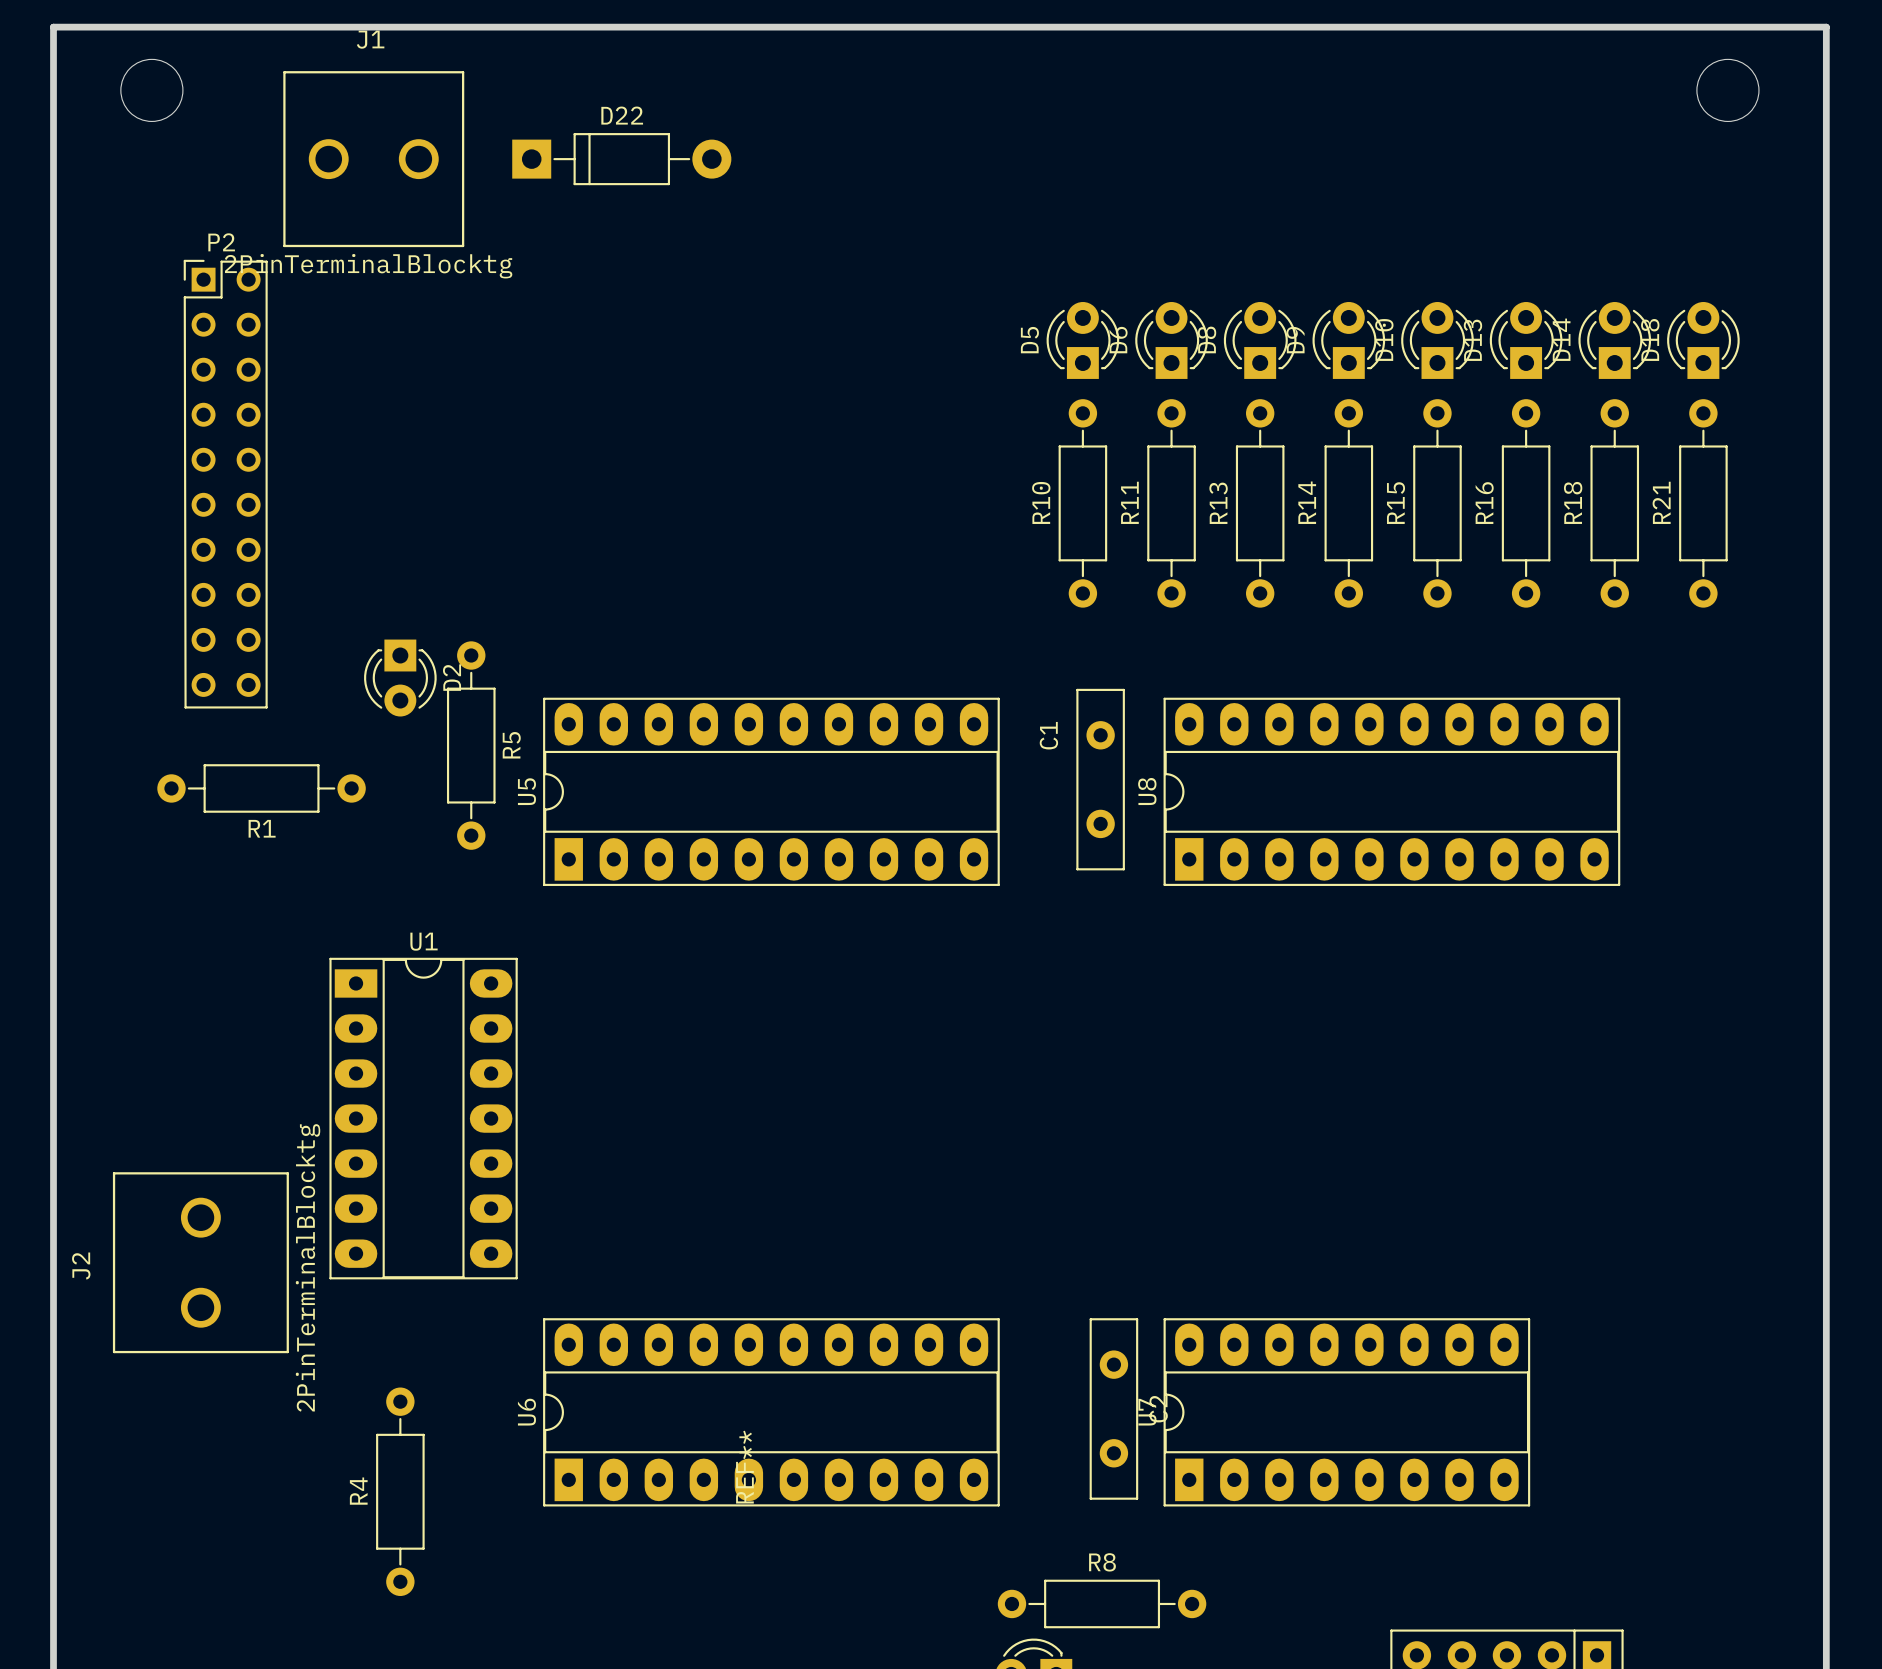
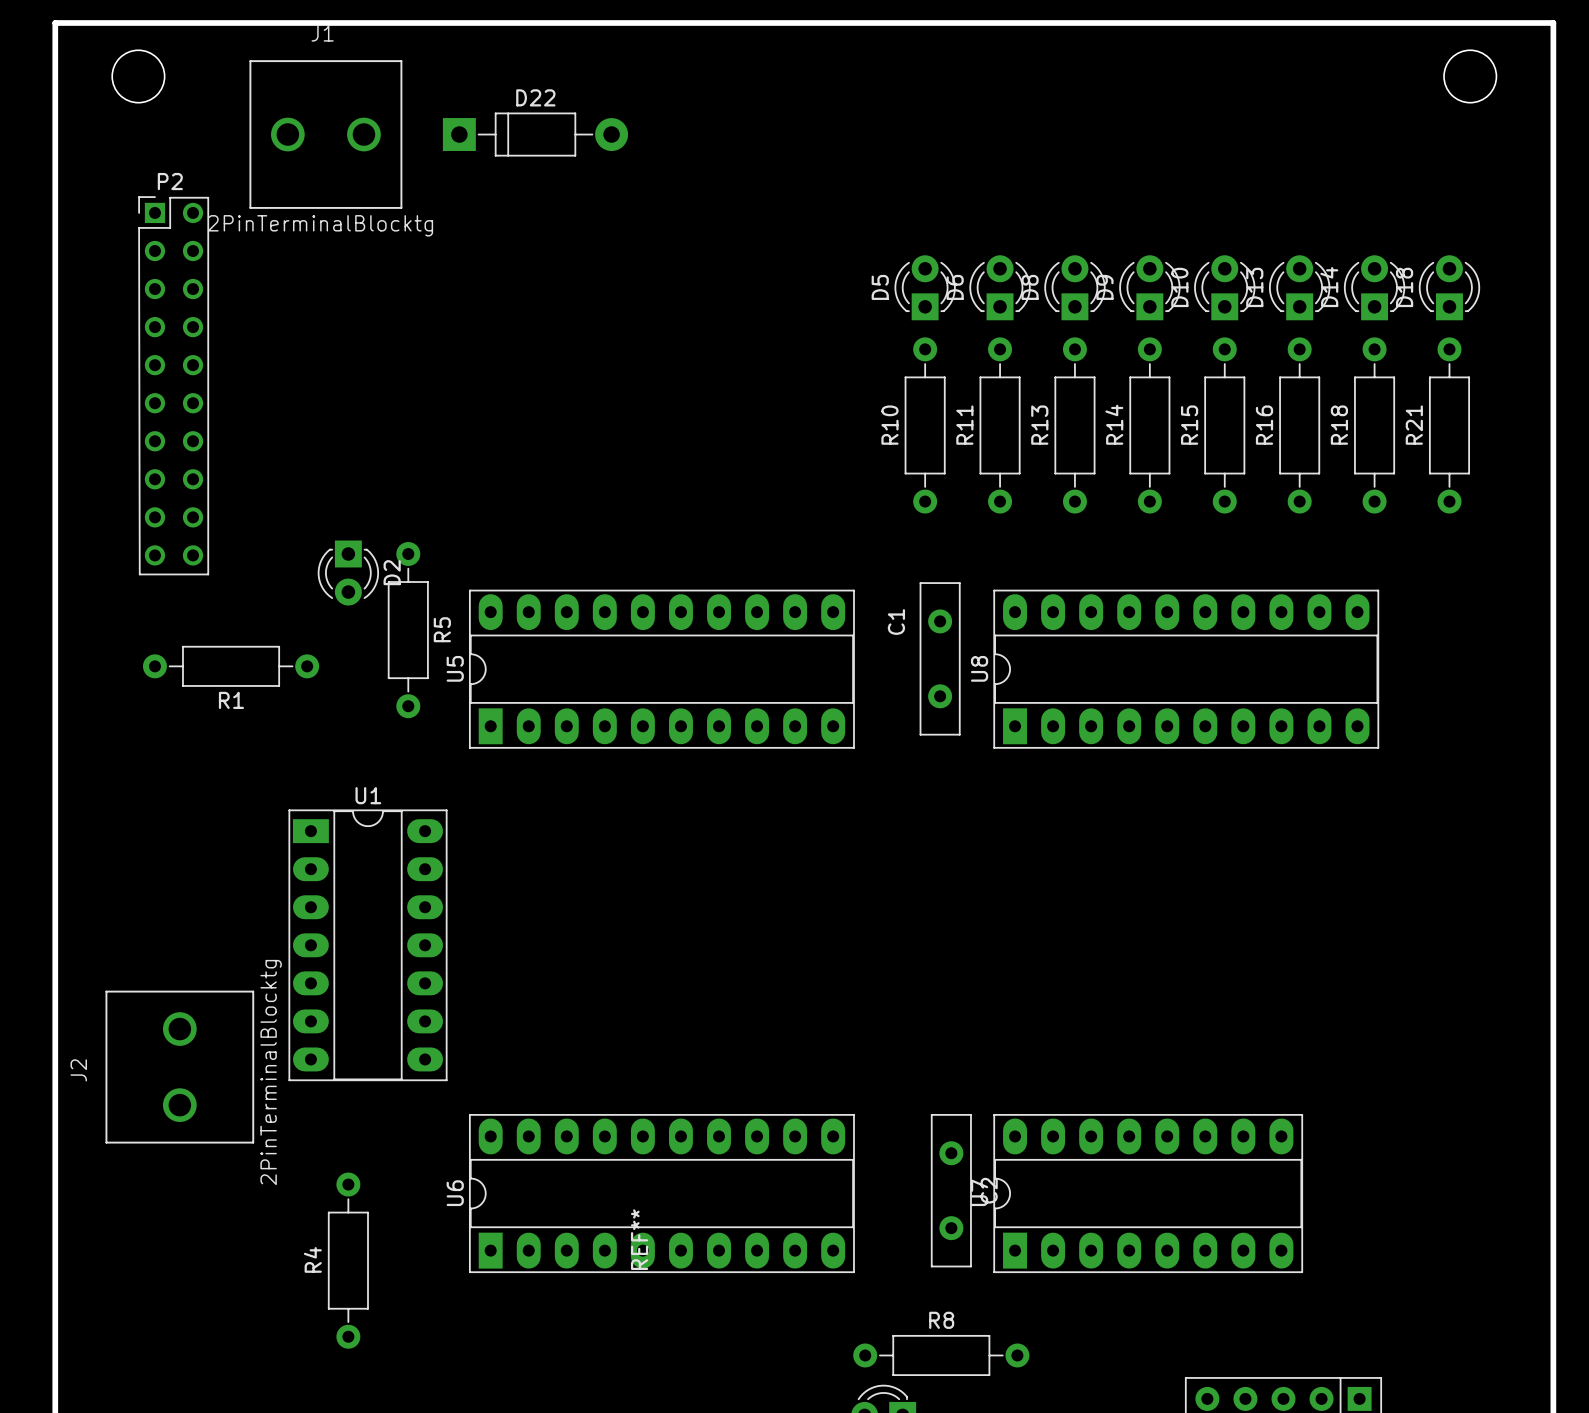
P2 position: (225, 484) -> (173, 385)

